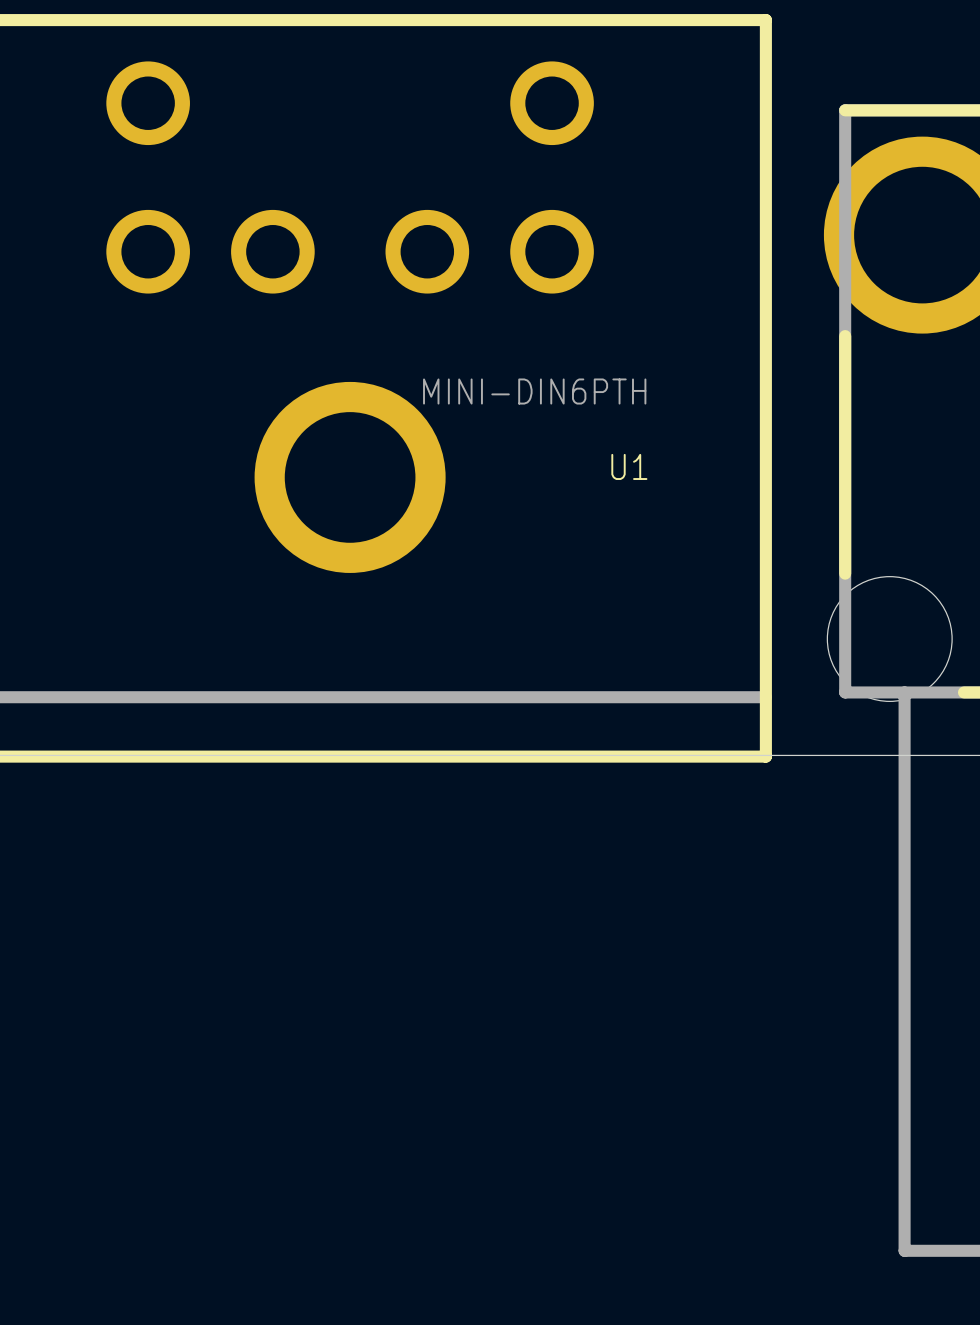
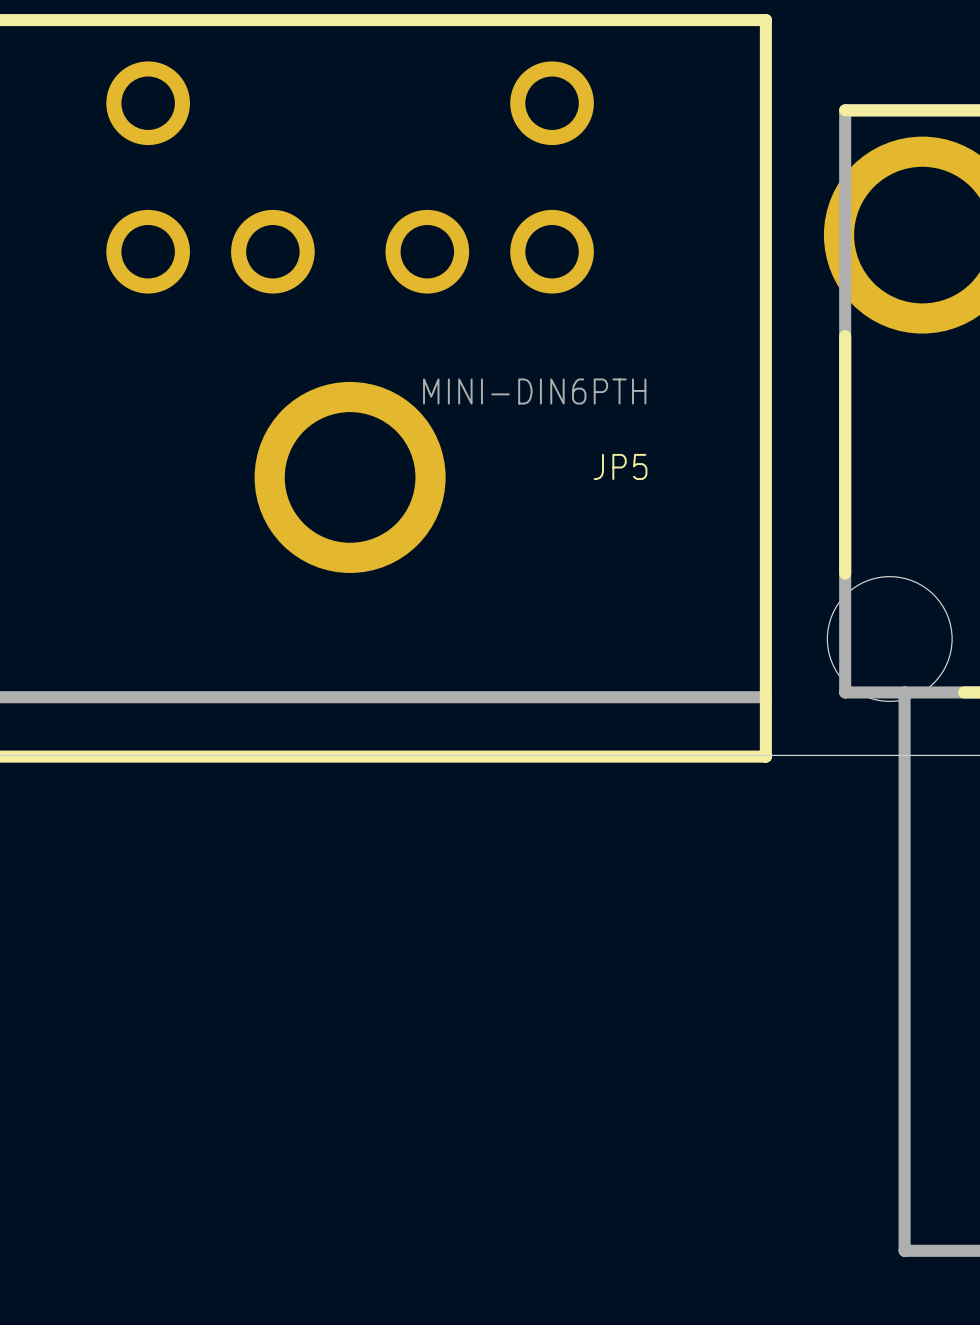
U1 name: U1 (629, 466) -> JP5 (620, 466)

